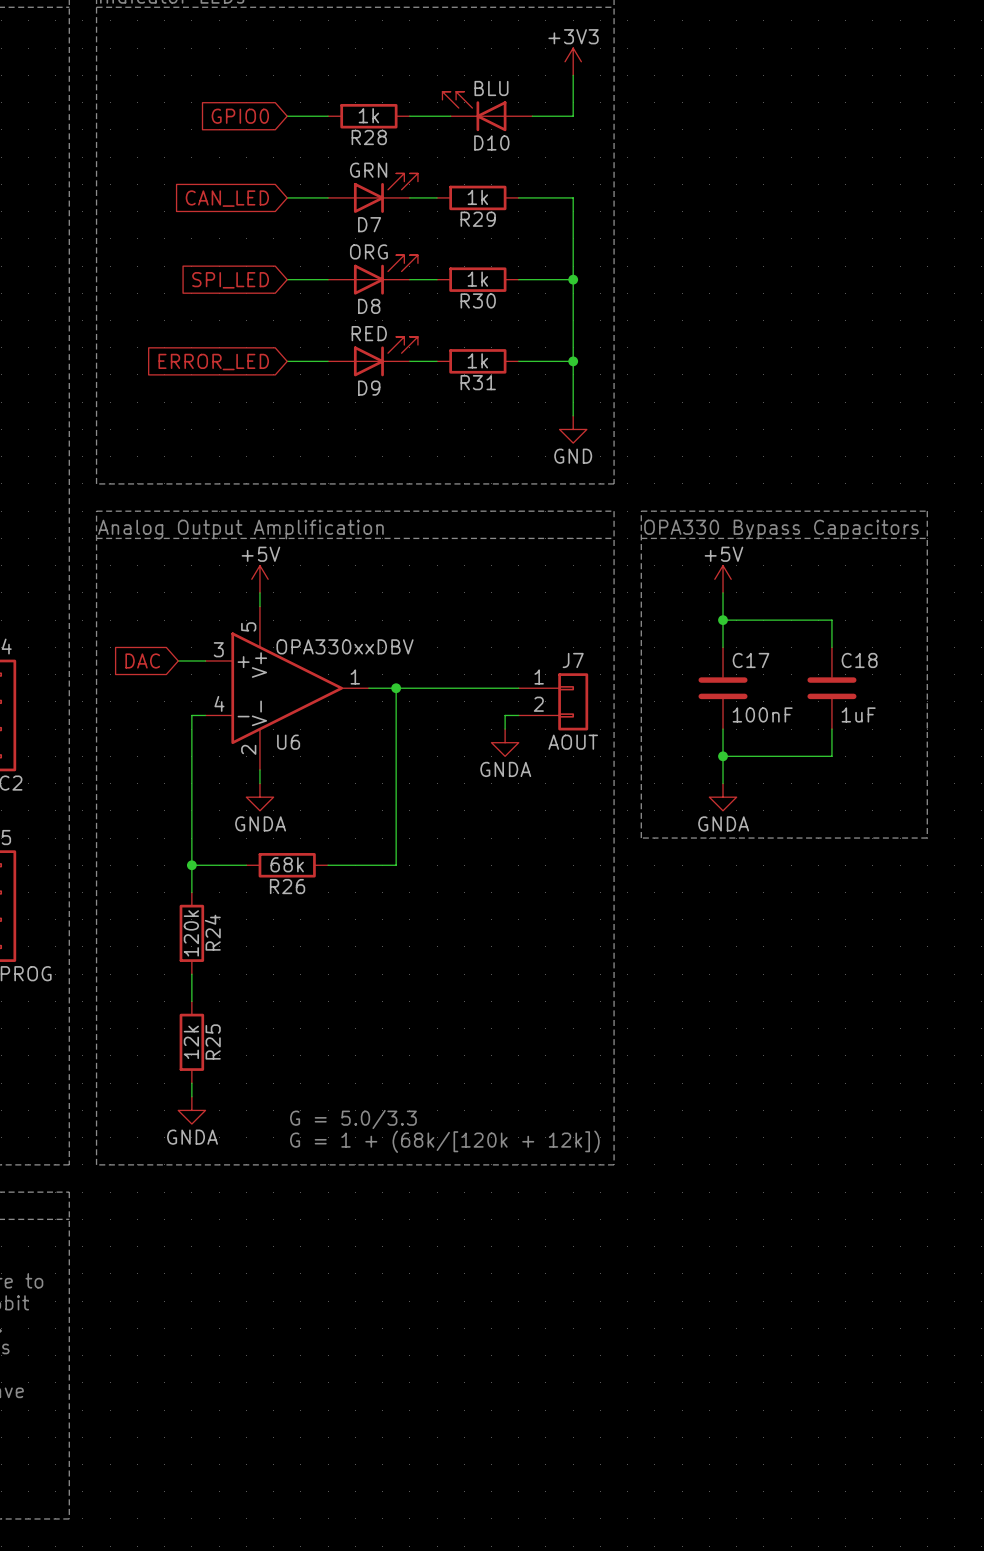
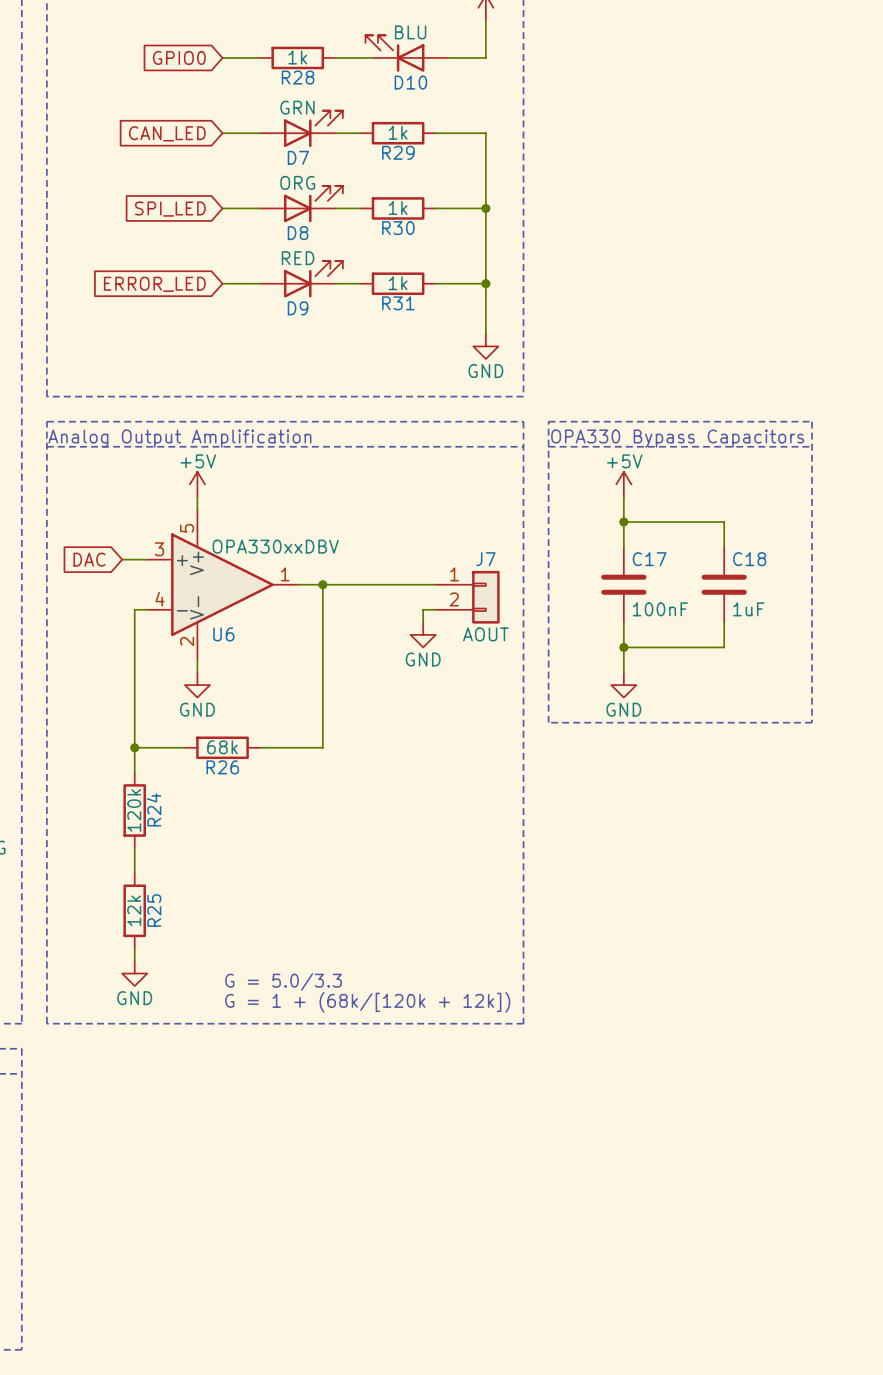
power symbol: GNDA (505, 742) -> GND (423, 634)
power symbol: GNDA (259, 797) -> GND (197, 685)
power symbol: GNDA (723, 797) -> GND (623, 685)
power symbol: GNDA (191, 1110) -> GND (134, 973)

